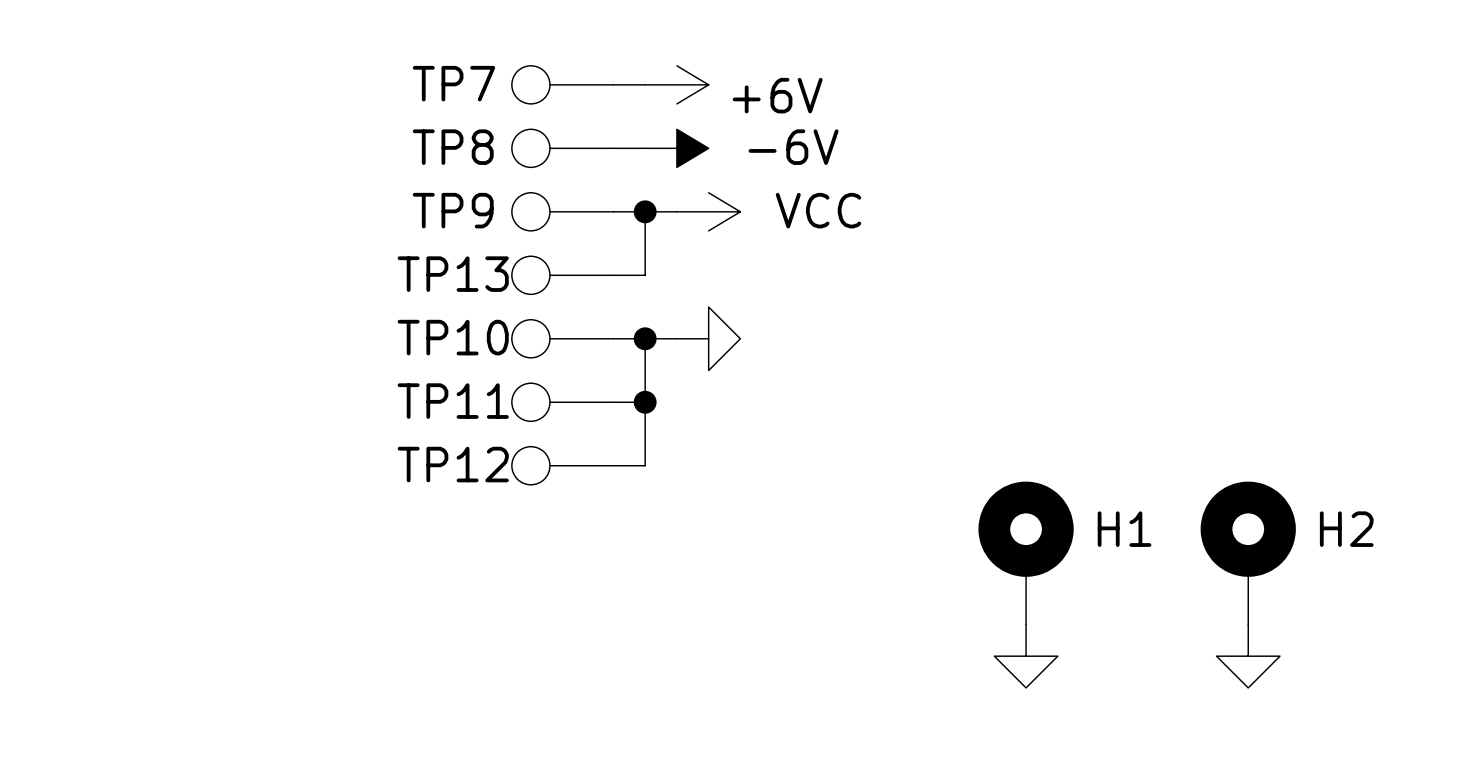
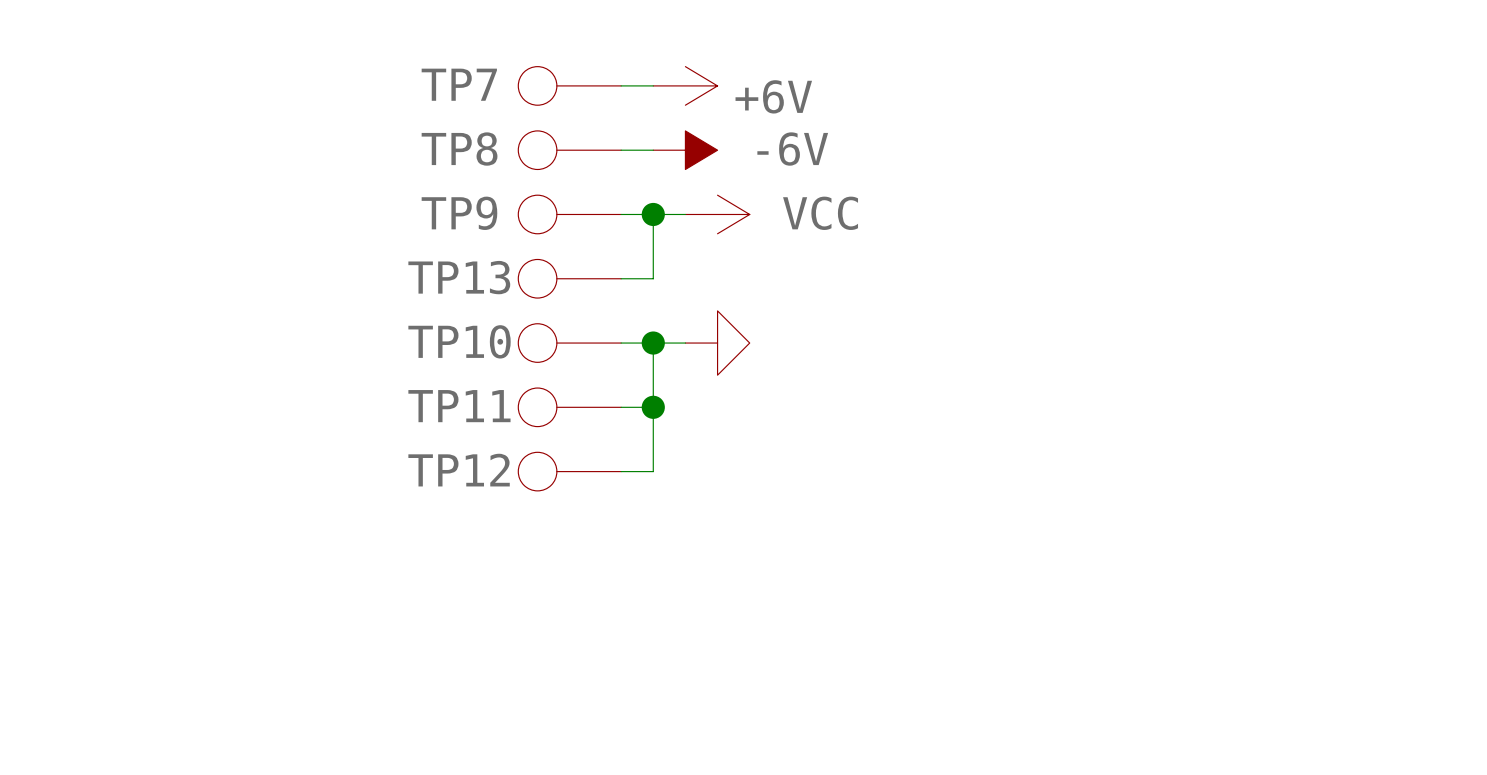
H1: (1026, 553) -> none
H2: (1248, 553) -> none
power symbol: (1026, 656) -> none
power symbol: (1248, 656) -> none

